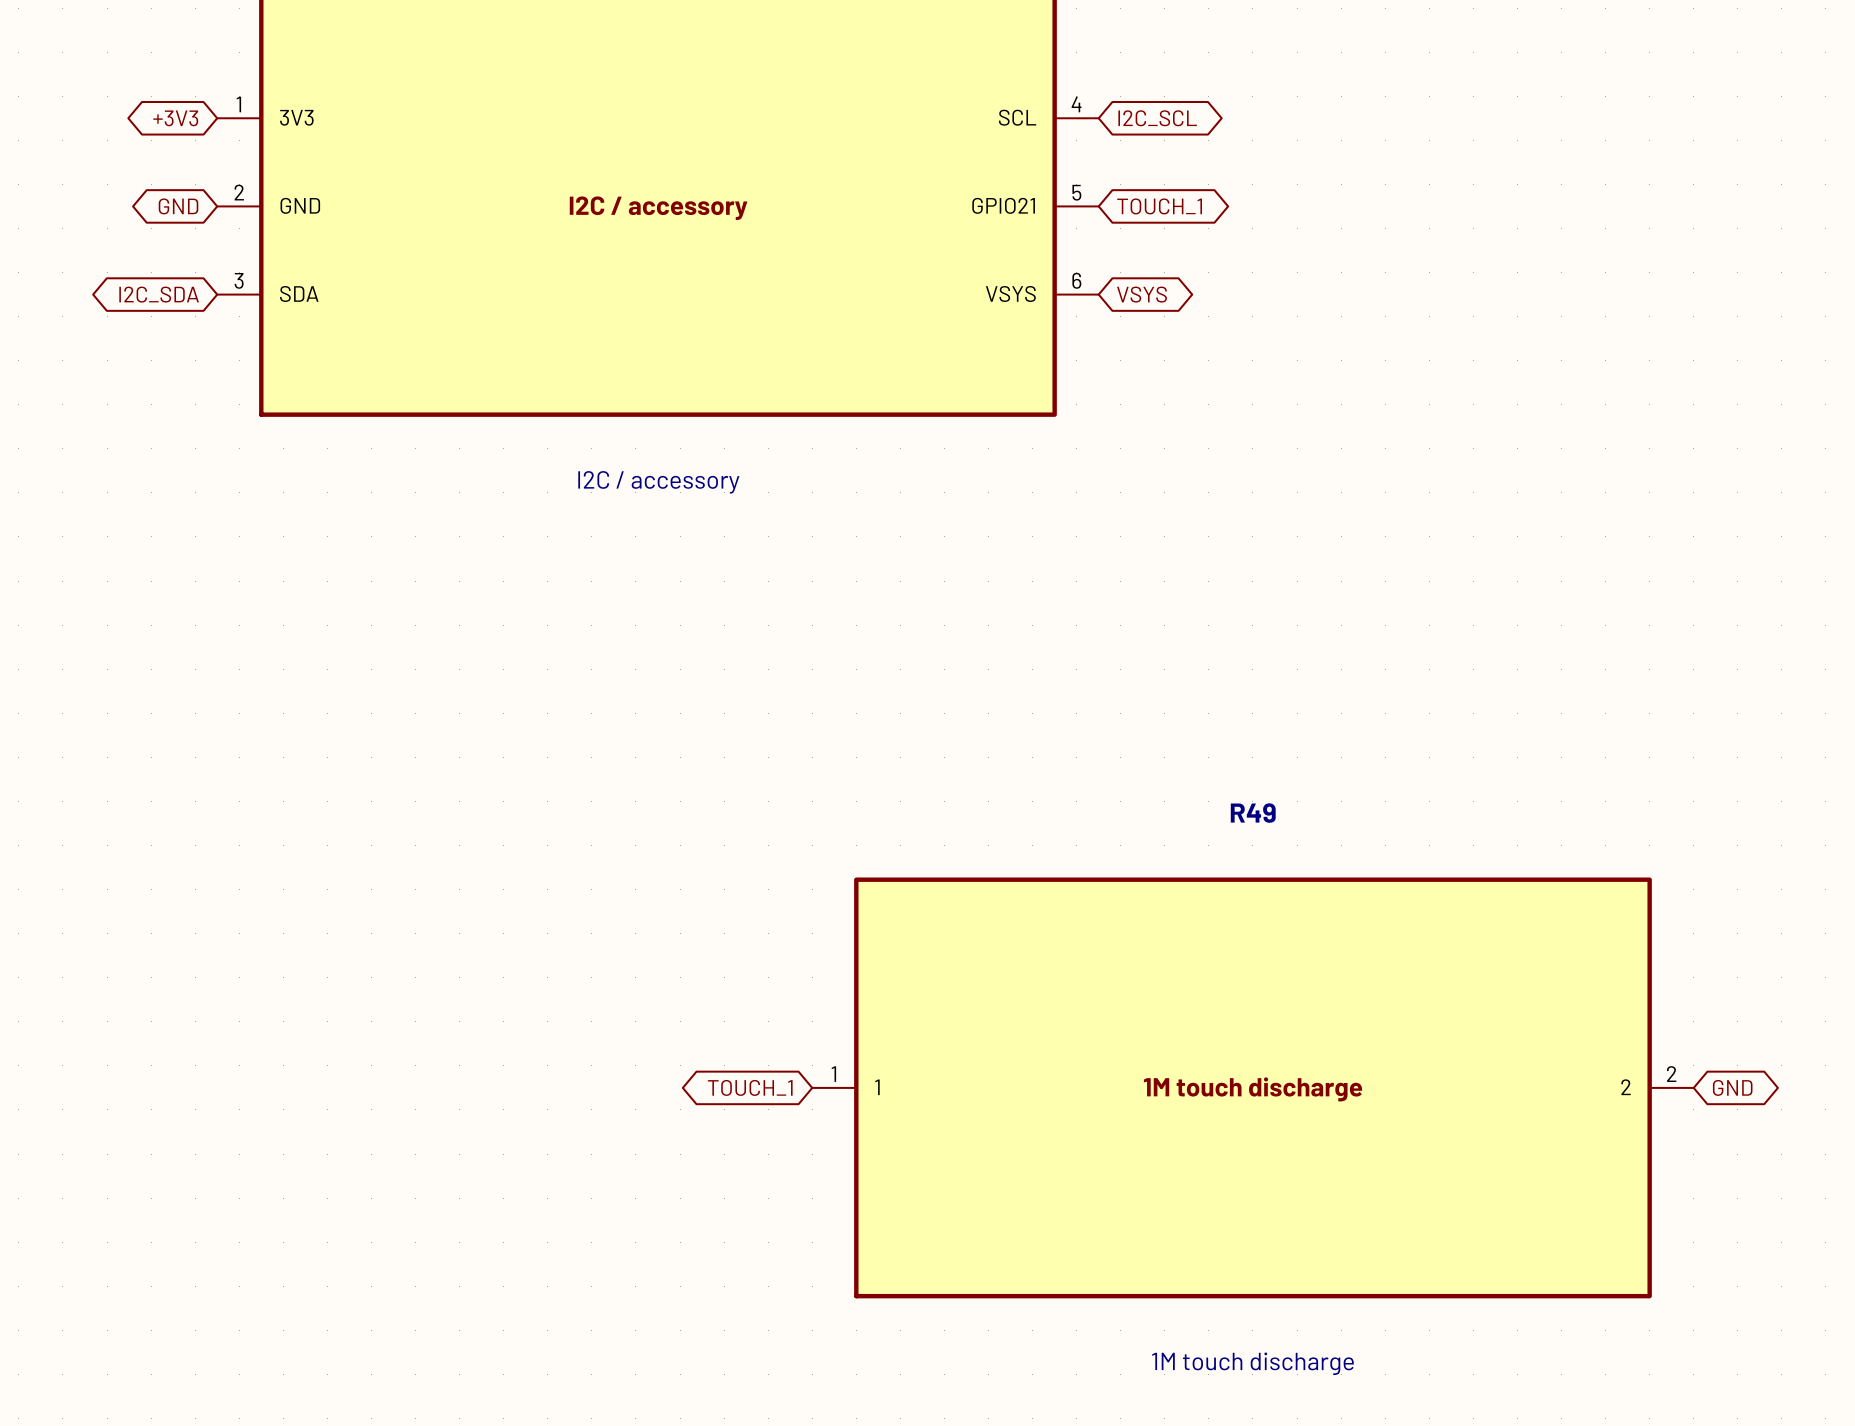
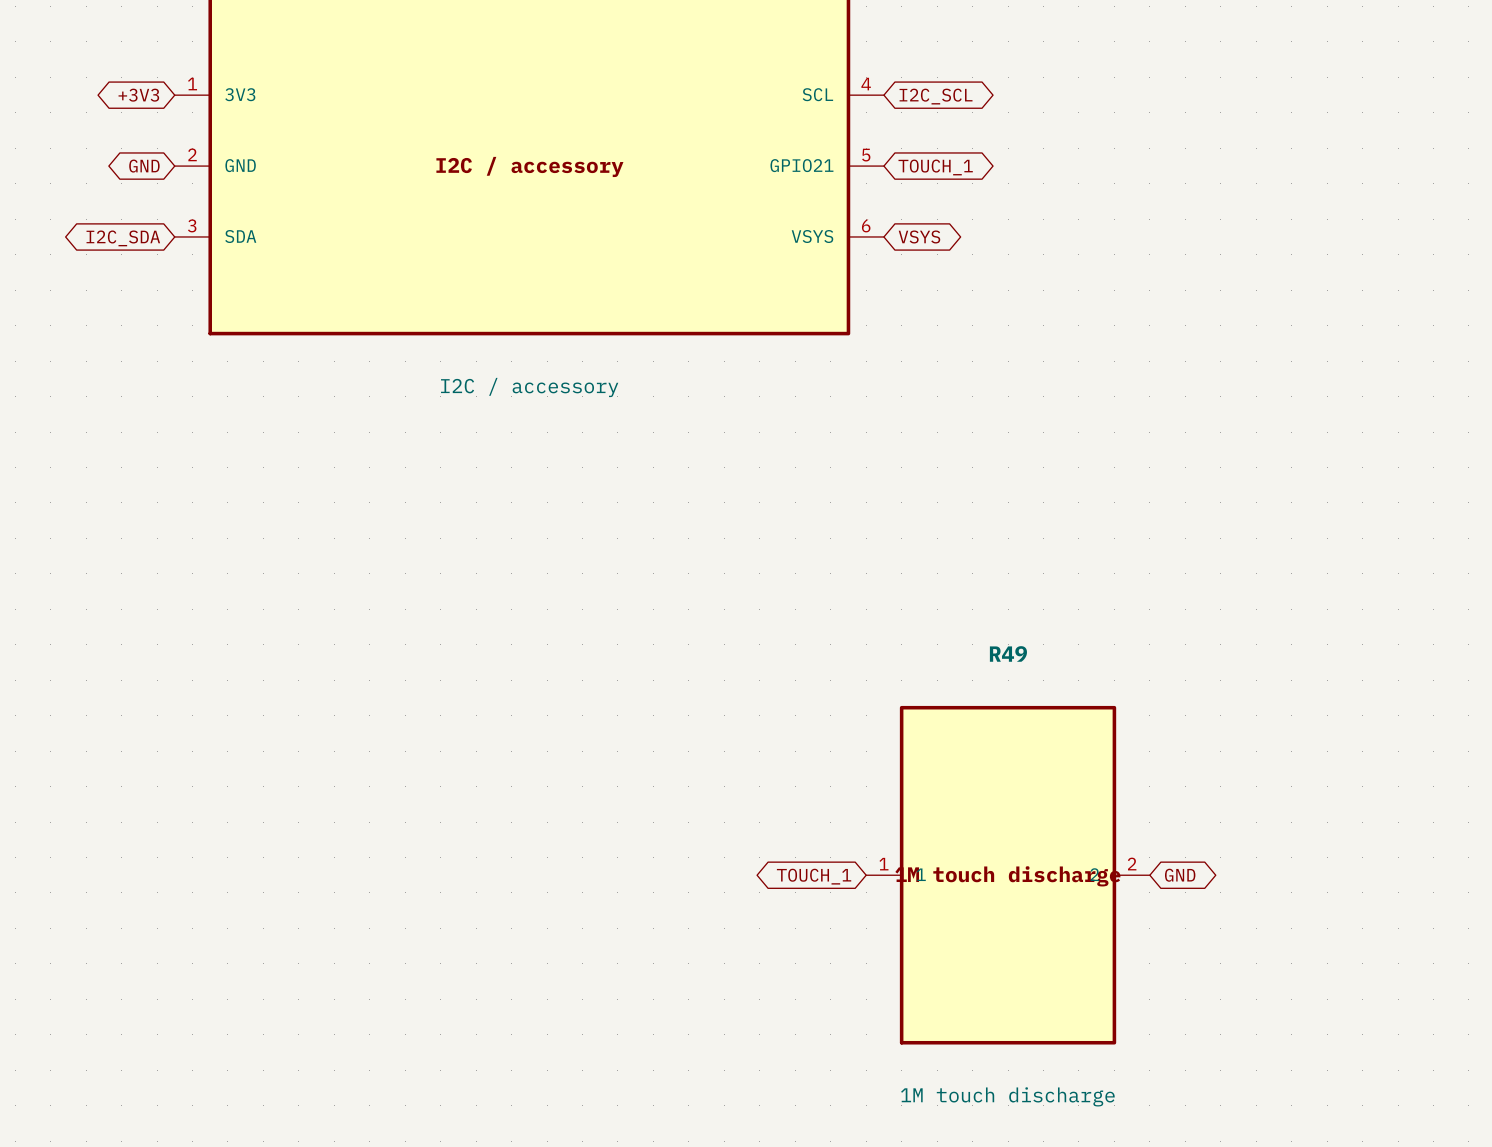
R49 symbol: [812, 877, 1694, 1299] -> [866, 705, 1150, 1045]
global label position: TOUCH_1 (750, 1087) -> TOUCH_1 (814, 876)
global label position: GND (1732, 1087) -> GND (1180, 875)

